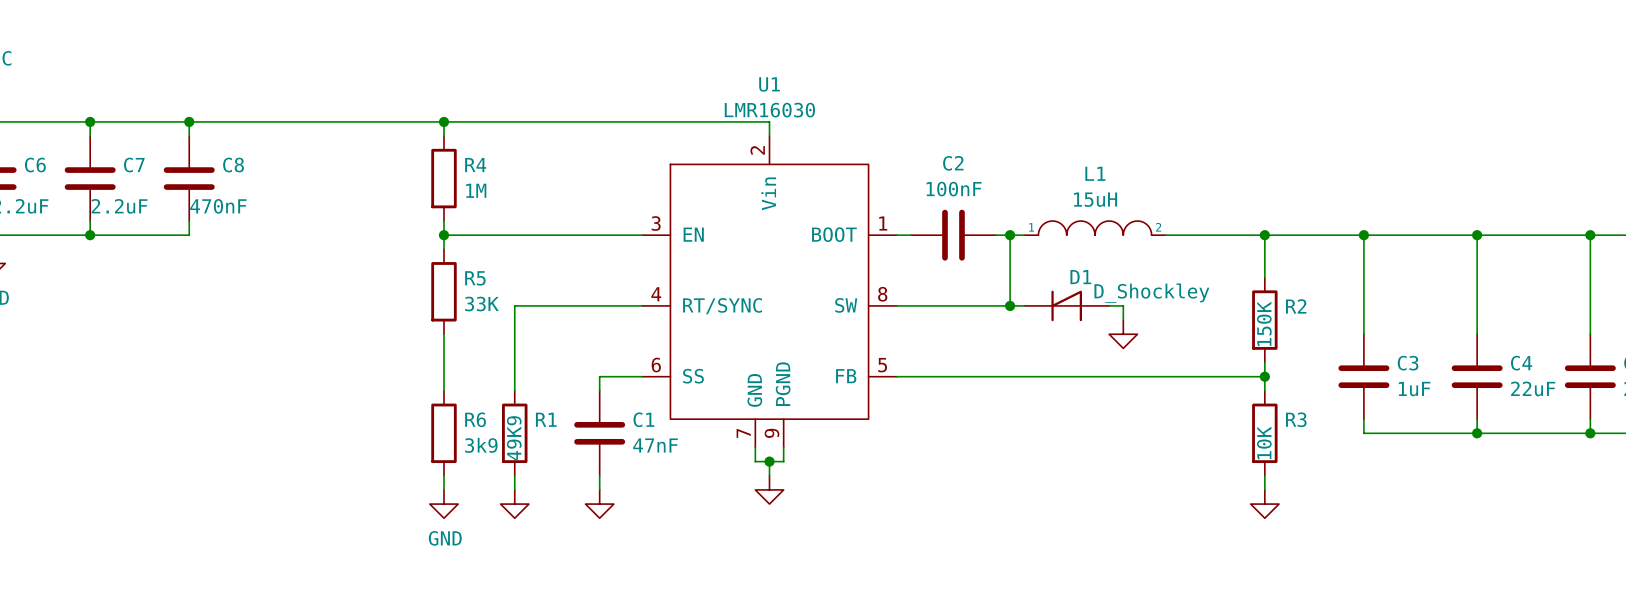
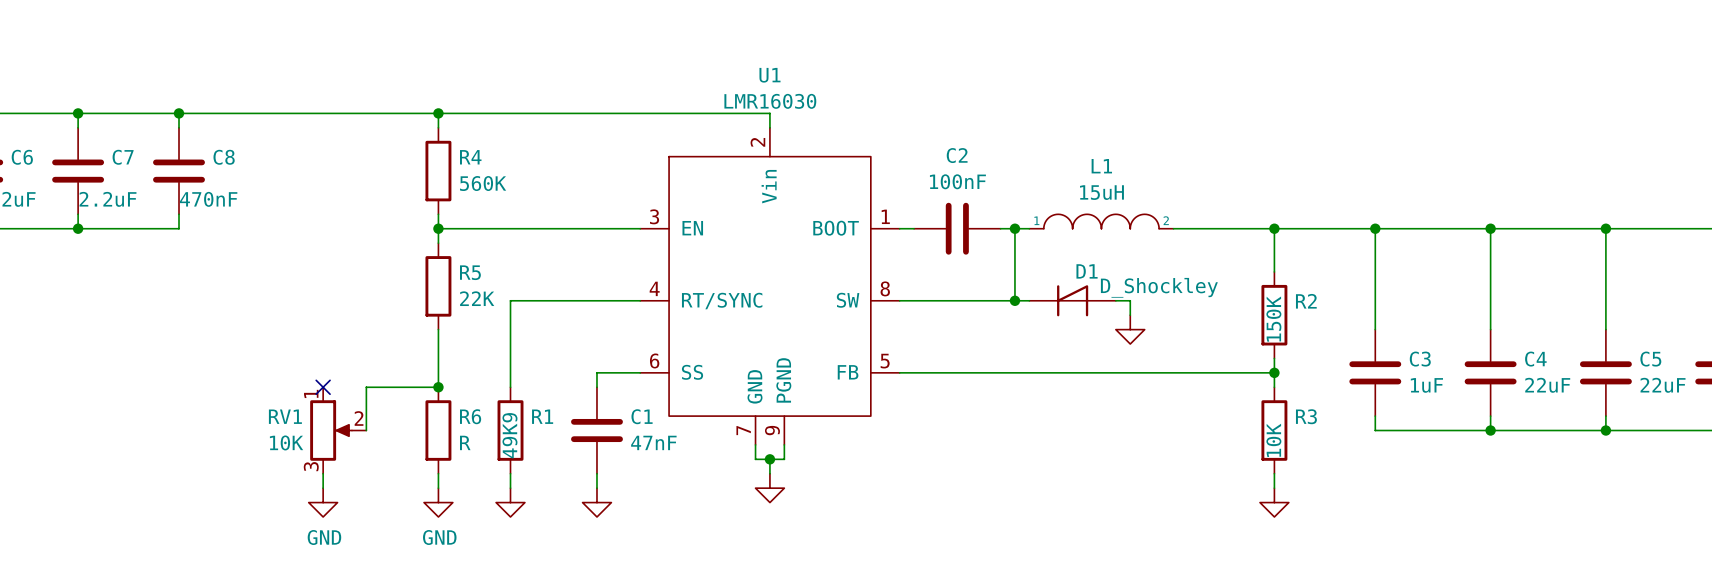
R4 value: 1M (476, 190) -> 560K (483, 183)
R5 value: 33K (481, 304) -> 22K (477, 298)
no-connect mark: none -> (323, 387)
wire: none -> (438, 387) (366, 387) (366, 430)
junction: none -> (438, 387)
RV1: none -> 10K (338, 430)
R6 value: 3k9 (481, 445) -> R (465, 442)
wire: none -> (323, 473) (323, 488)
power symbol: none -> GND (323, 502)

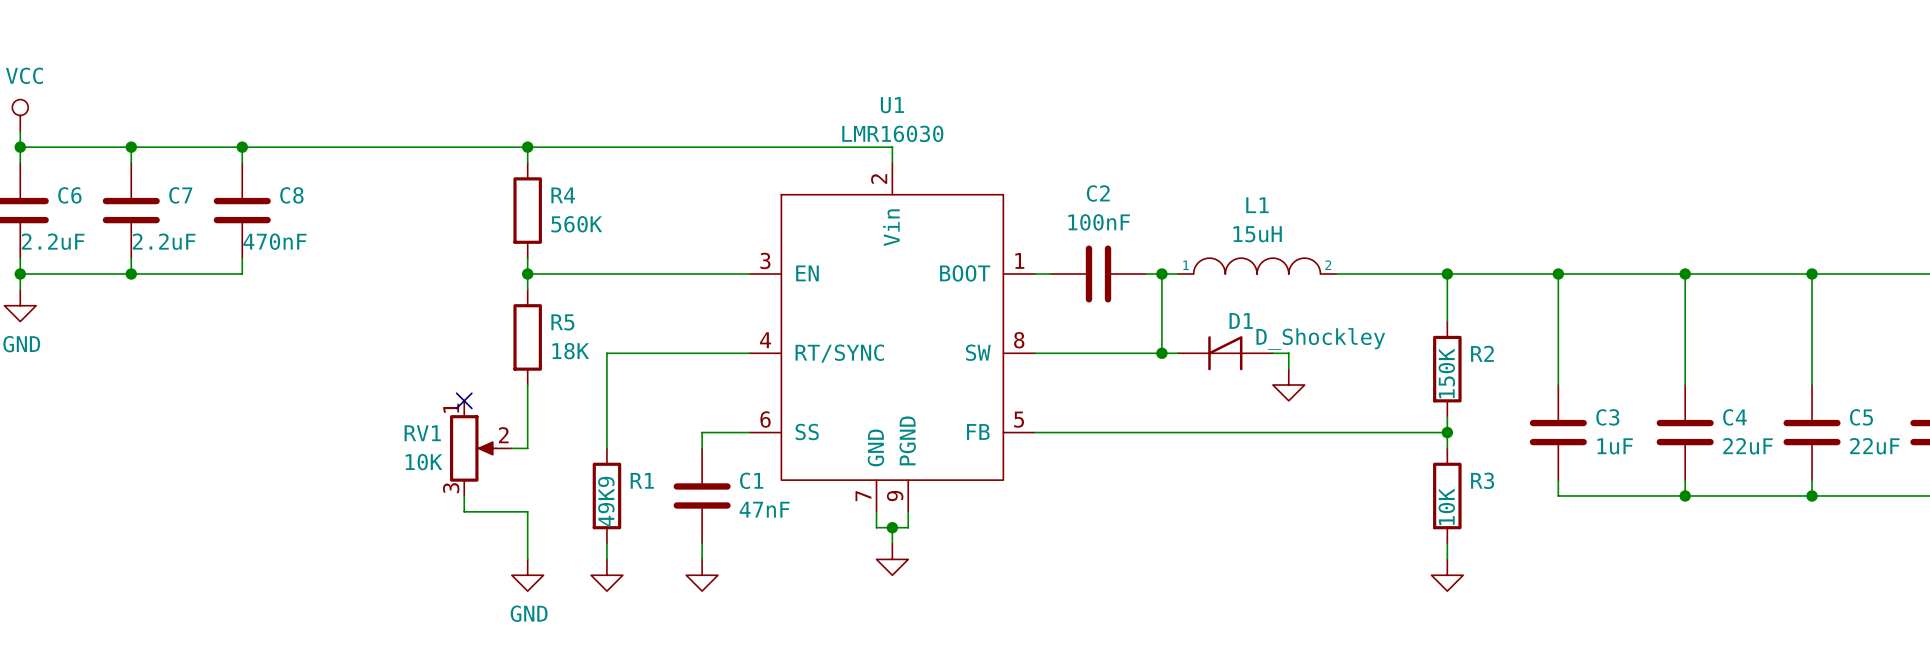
R5 value: 22K (477, 298) -> 18K (570, 351)
no-connect mark: none -> (464, 400)
no-connect mark: (323, 387) -> none
wire: (424, 387) (366, 387) (366, 430) -> none
junction: (438, 387) -> none
RV1 position: (338, 430) -> (480, 448)
wire: none -> (464, 495) (464, 511) (527, 511) (527, 543)
R6: R (438, 430) -> none
wire: (323, 473) (323, 488) -> none
power symbol: GND (323, 502) -> none

